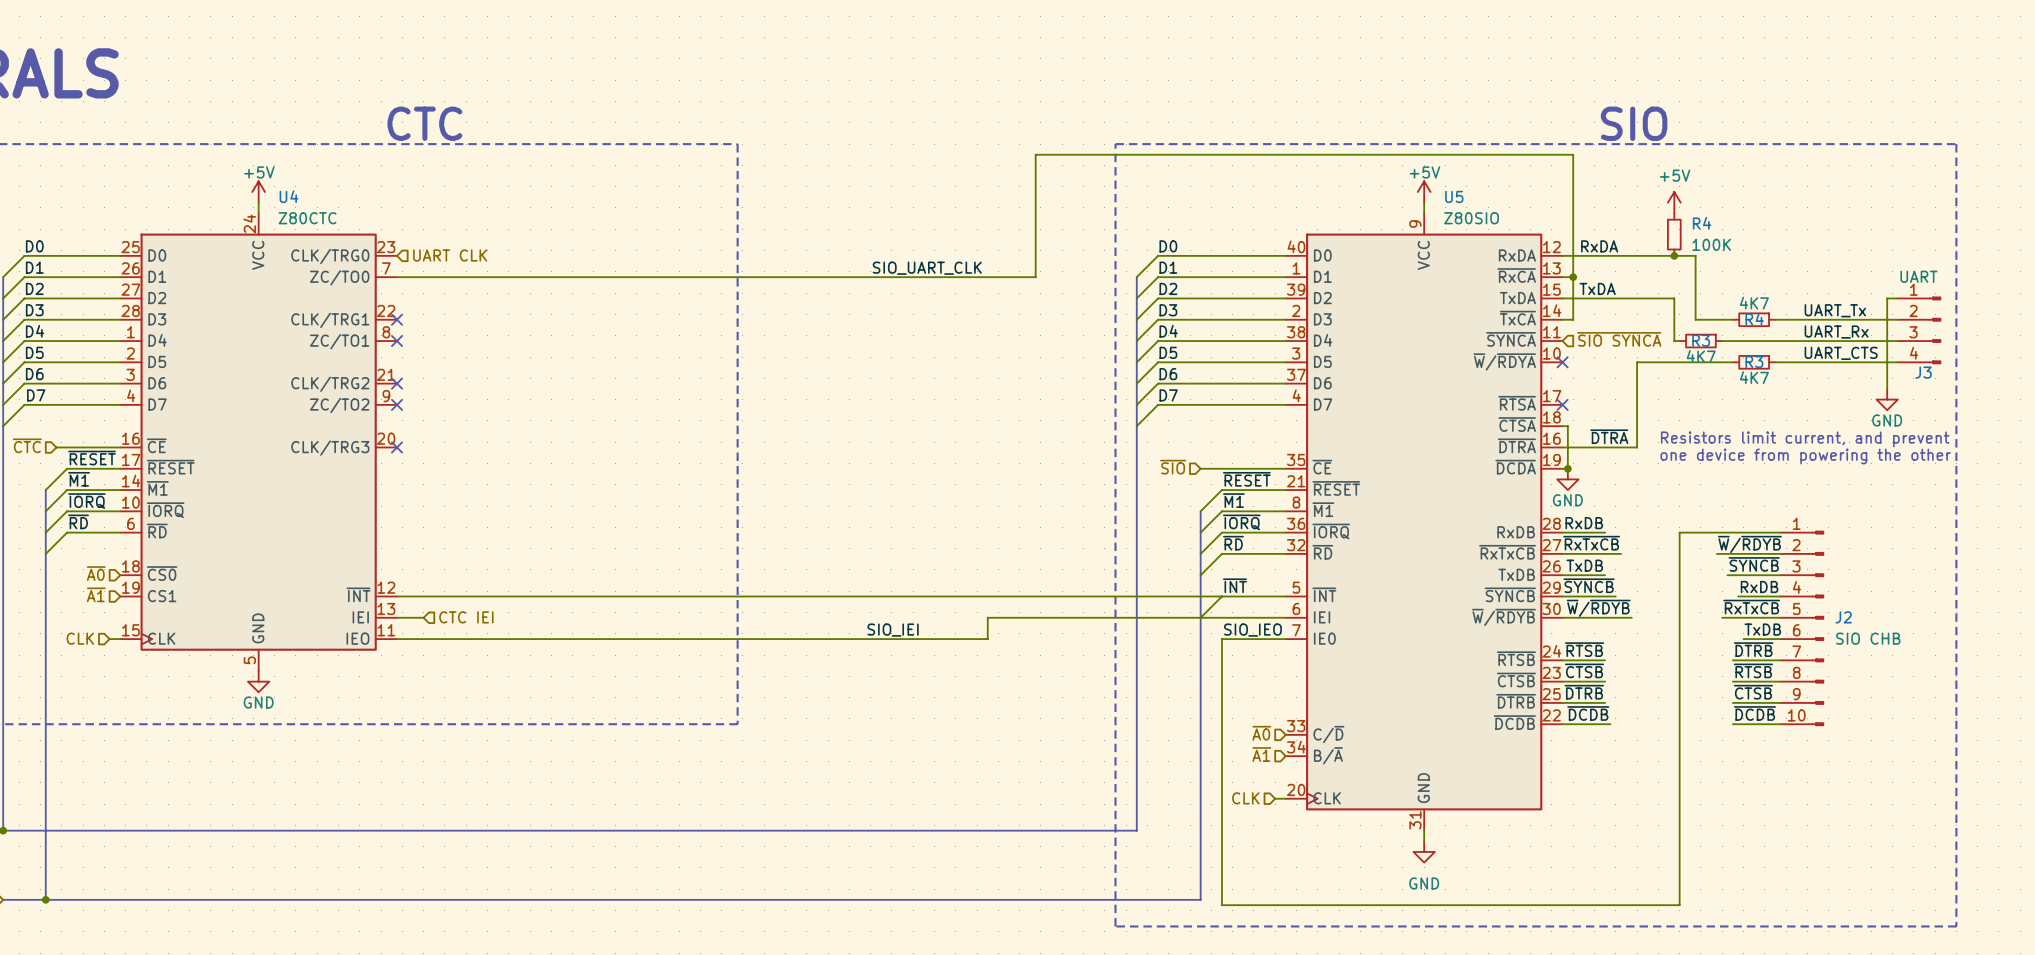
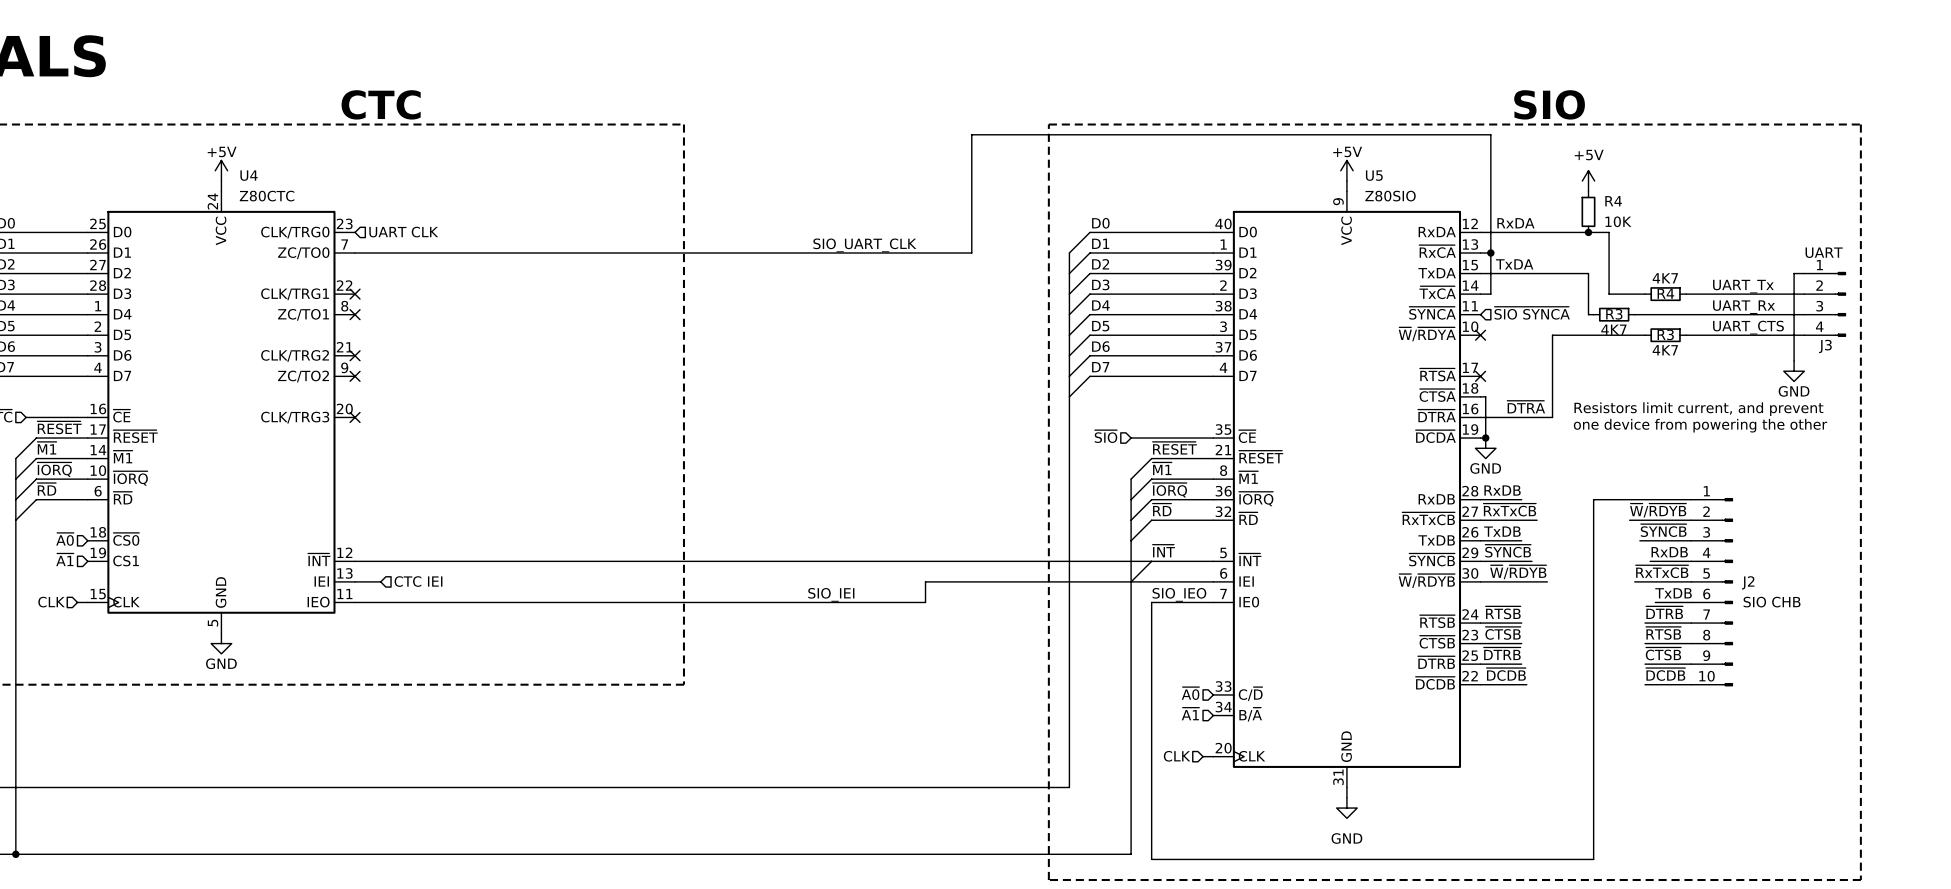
R4 value: 100K (1711, 244) -> 10K (1618, 221)

